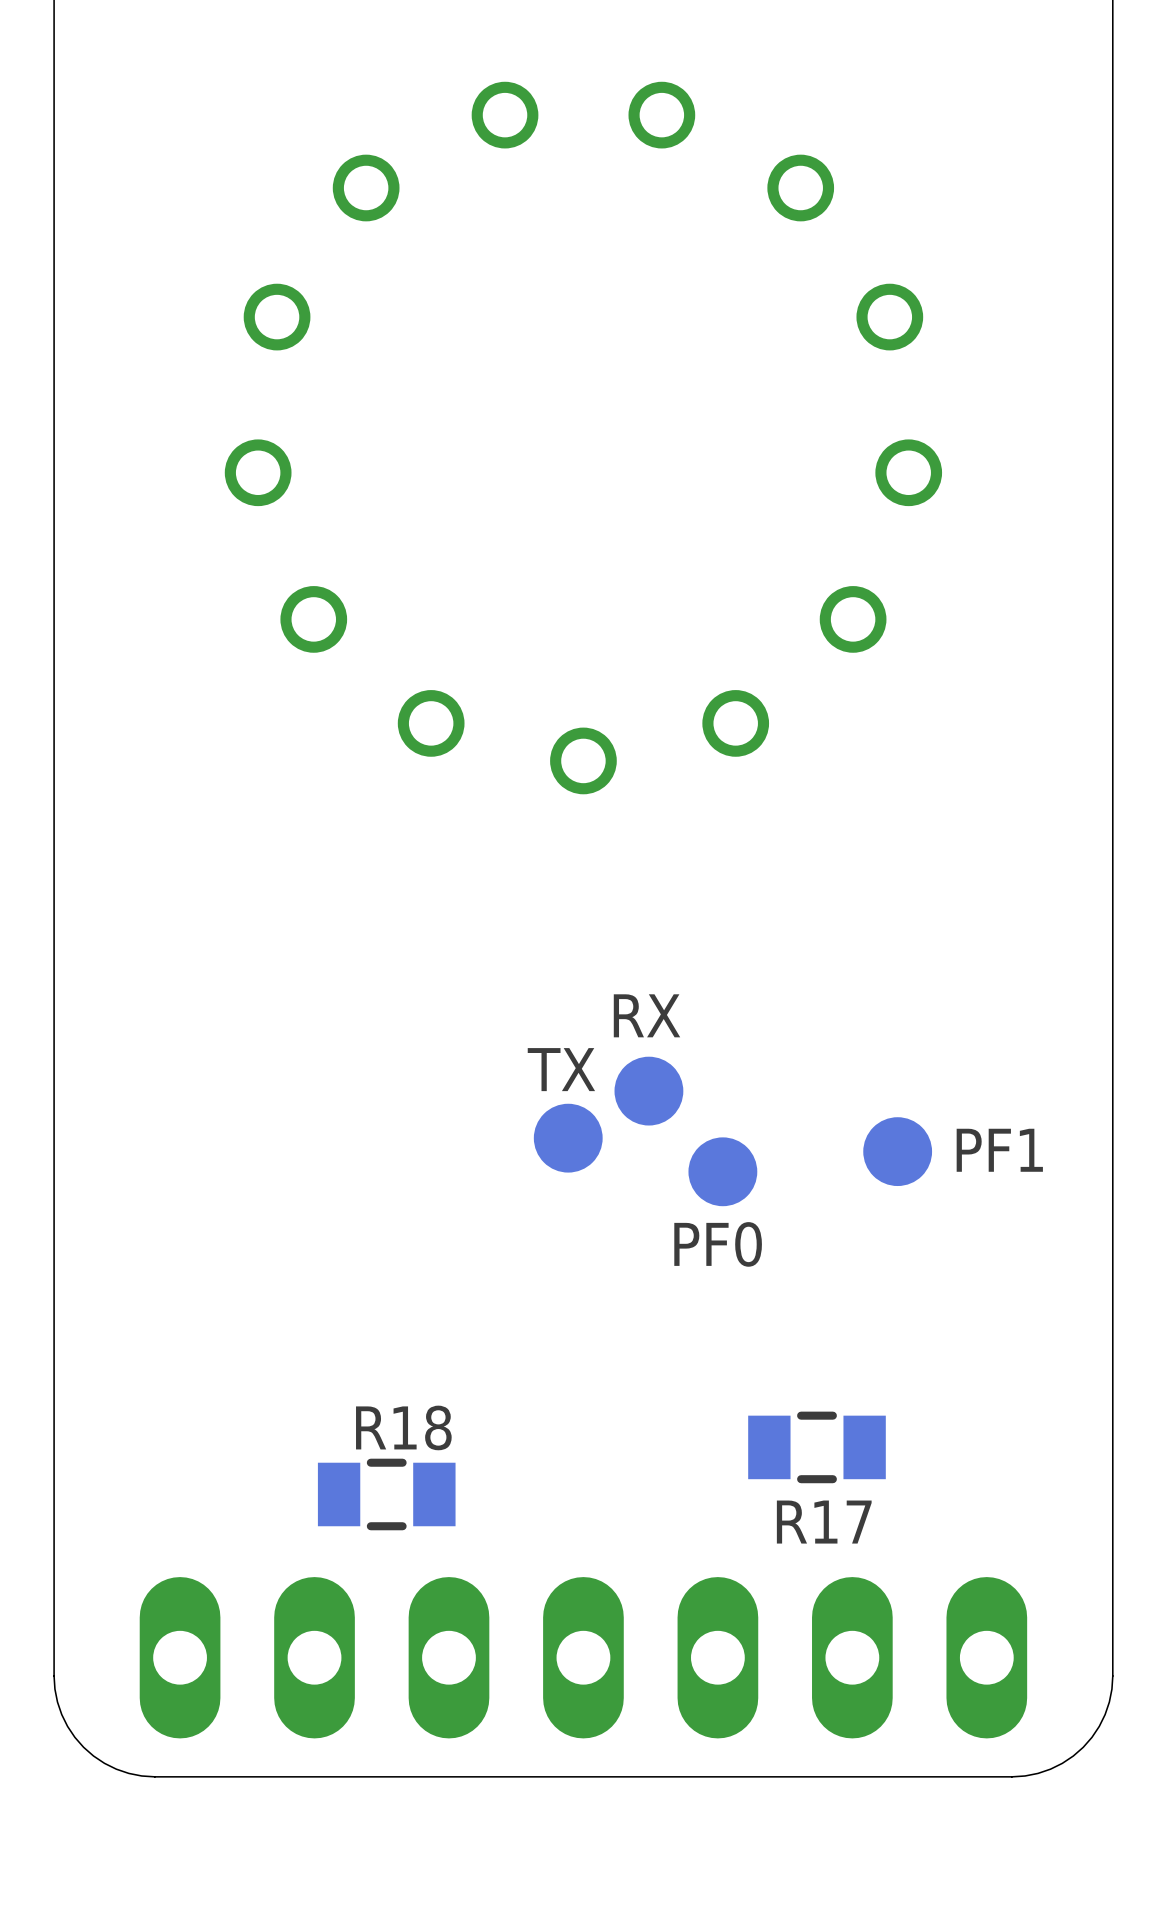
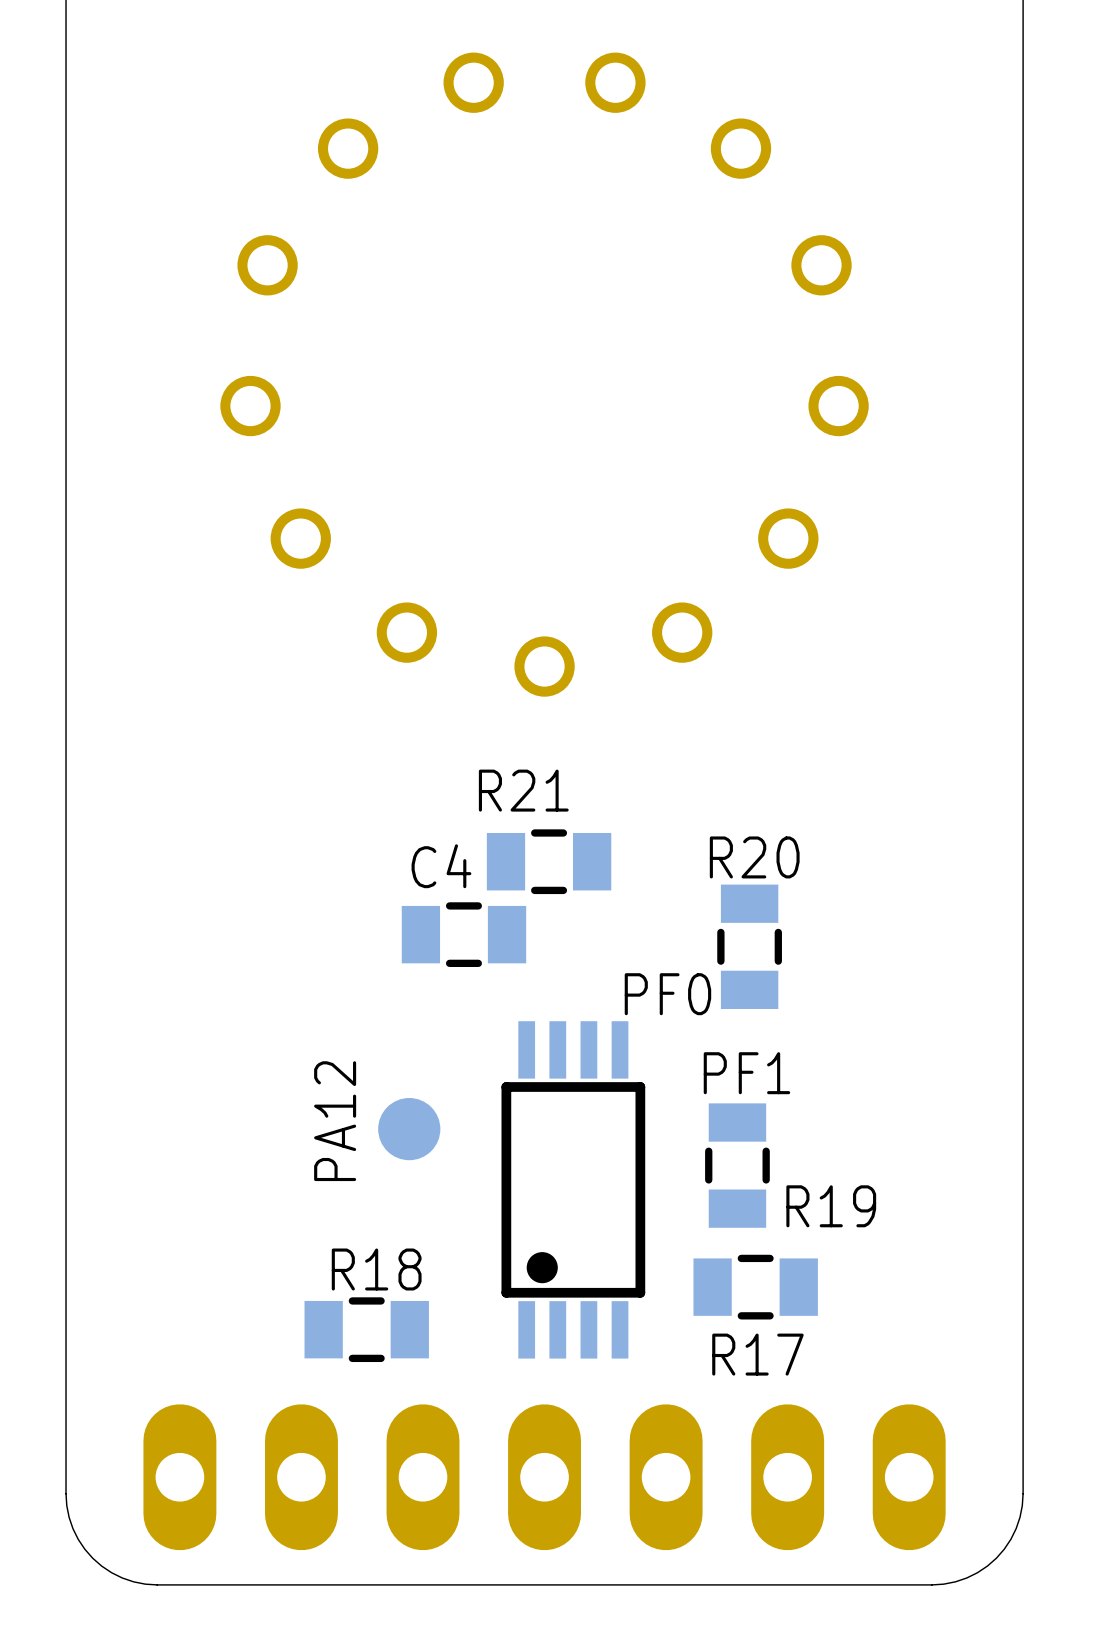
R21: none -> (549, 861)
text: RX (647, 1015) -> none
C4: none -> (463, 934)
text: TX (561, 1069) -> none
R20: none -> (749, 946)
part: (648, 1091) -> none
part: (568, 1138) -> none
text position: PF1 (999, 1150) -> PF1 (746, 1073)
part: (897, 1151) -> none
part: (722, 1171) -> none
text position: PF0 (718, 1244) -> PF0 (667, 994)
text: none -> PA12 (335, 1121)
part: none -> (409, 1129)
R19: none -> (737, 1165)
part: none -> (573, 1189)

